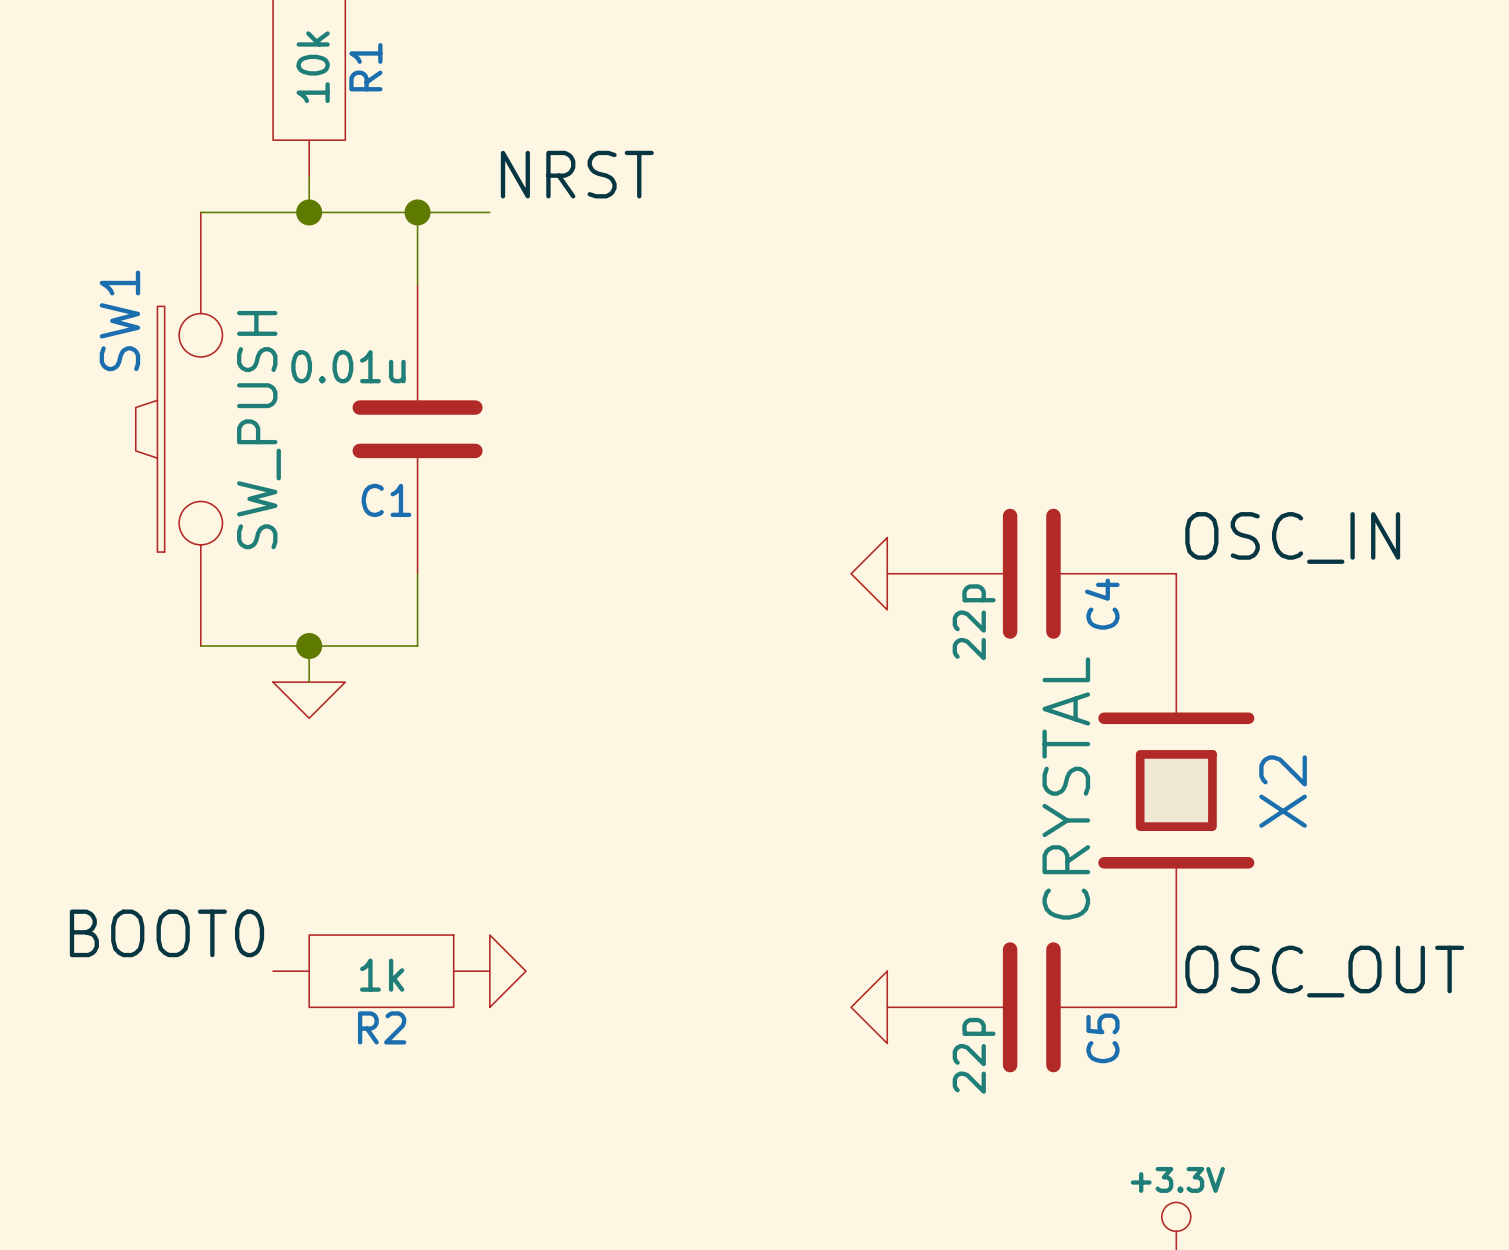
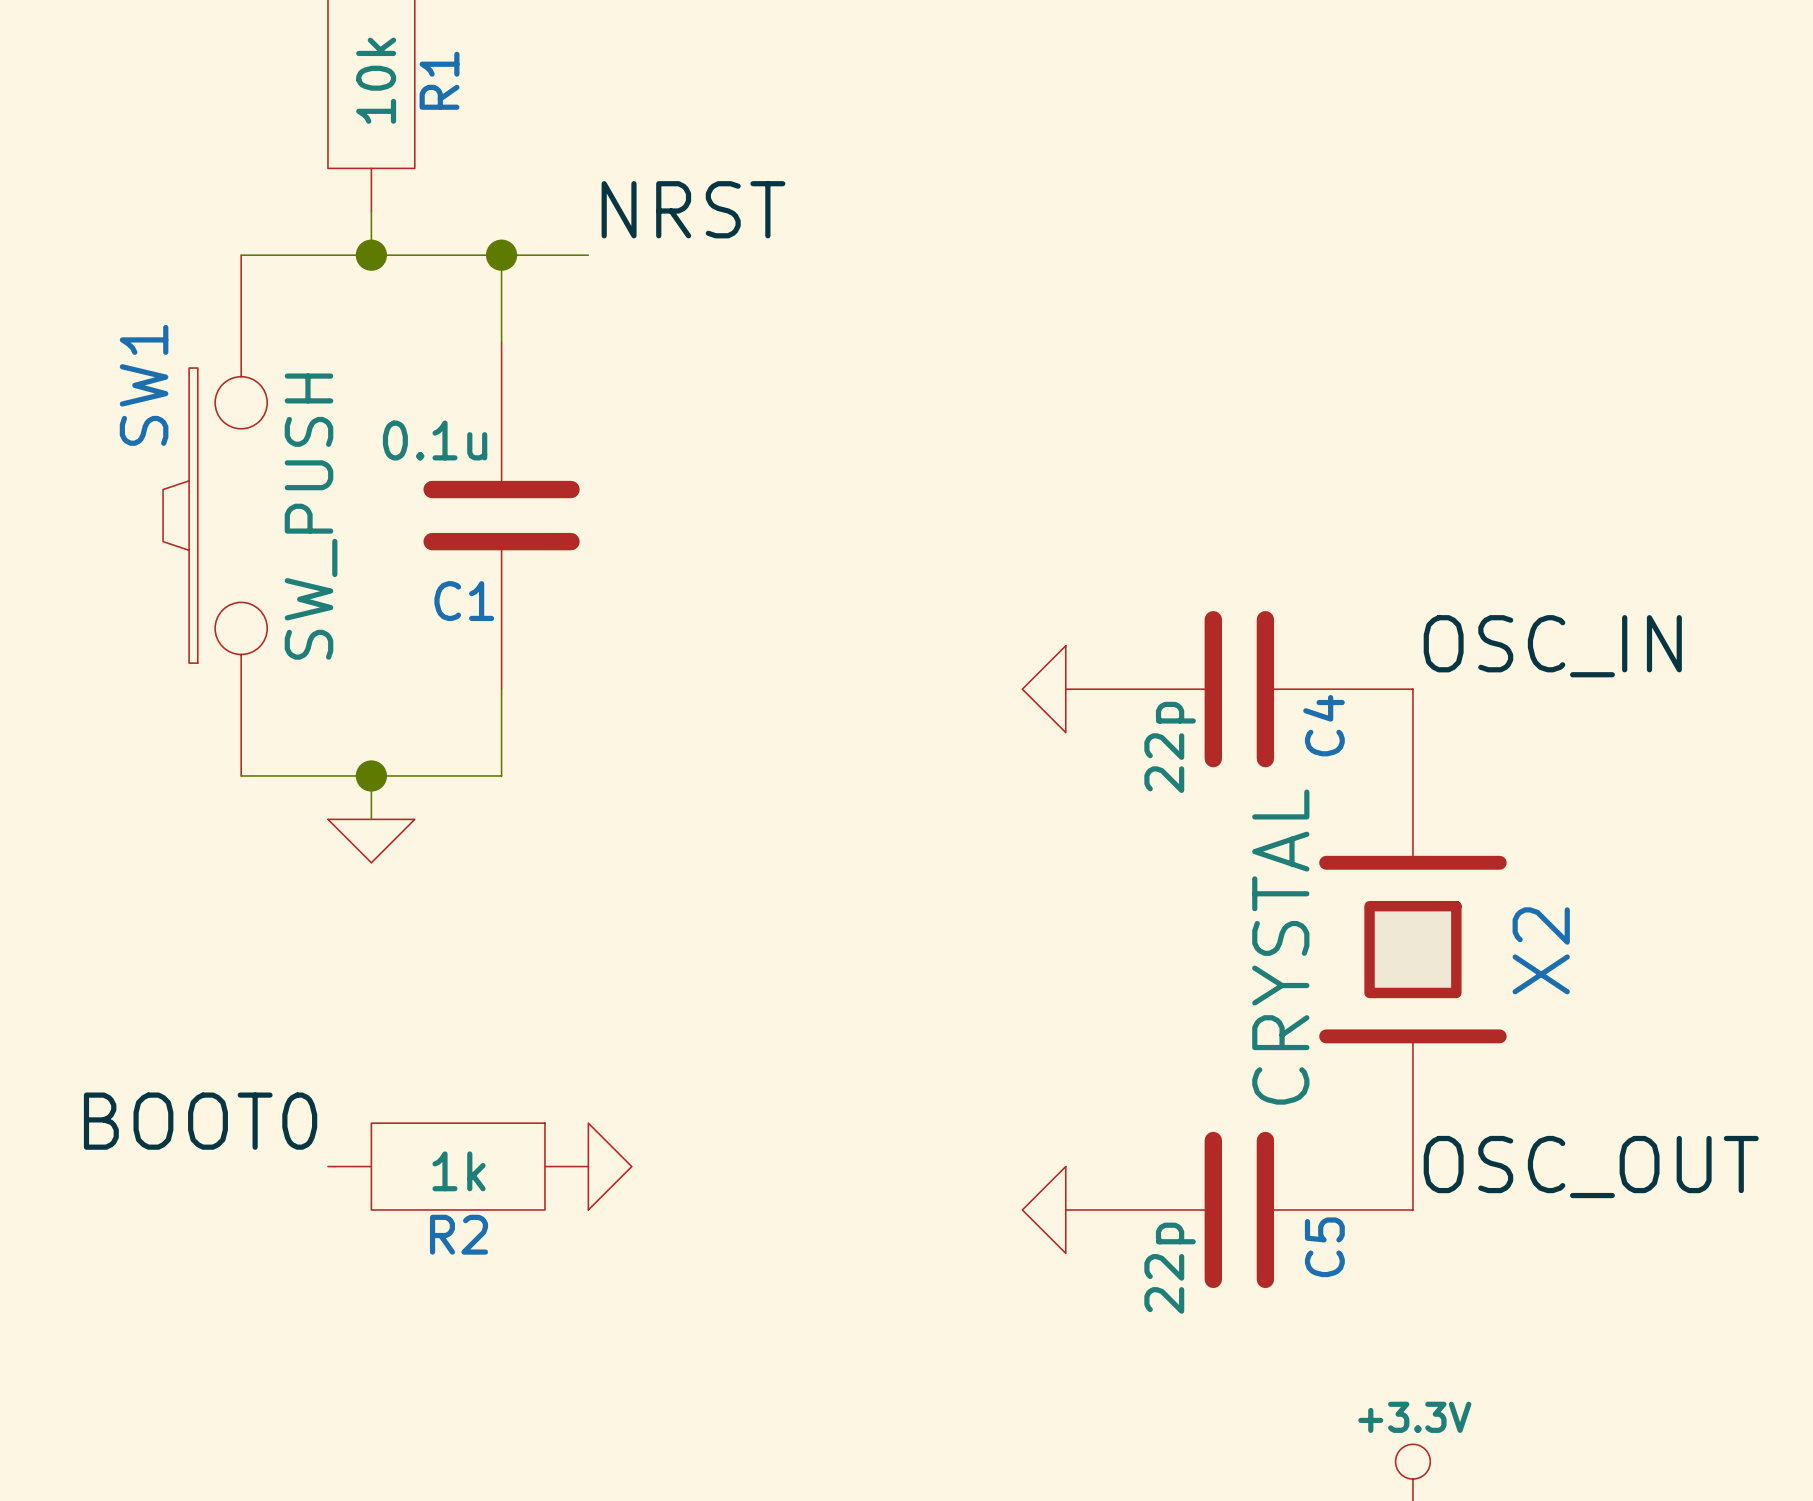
C1 value: 0.01u (348, 366) -> 0.1u (435, 440)

